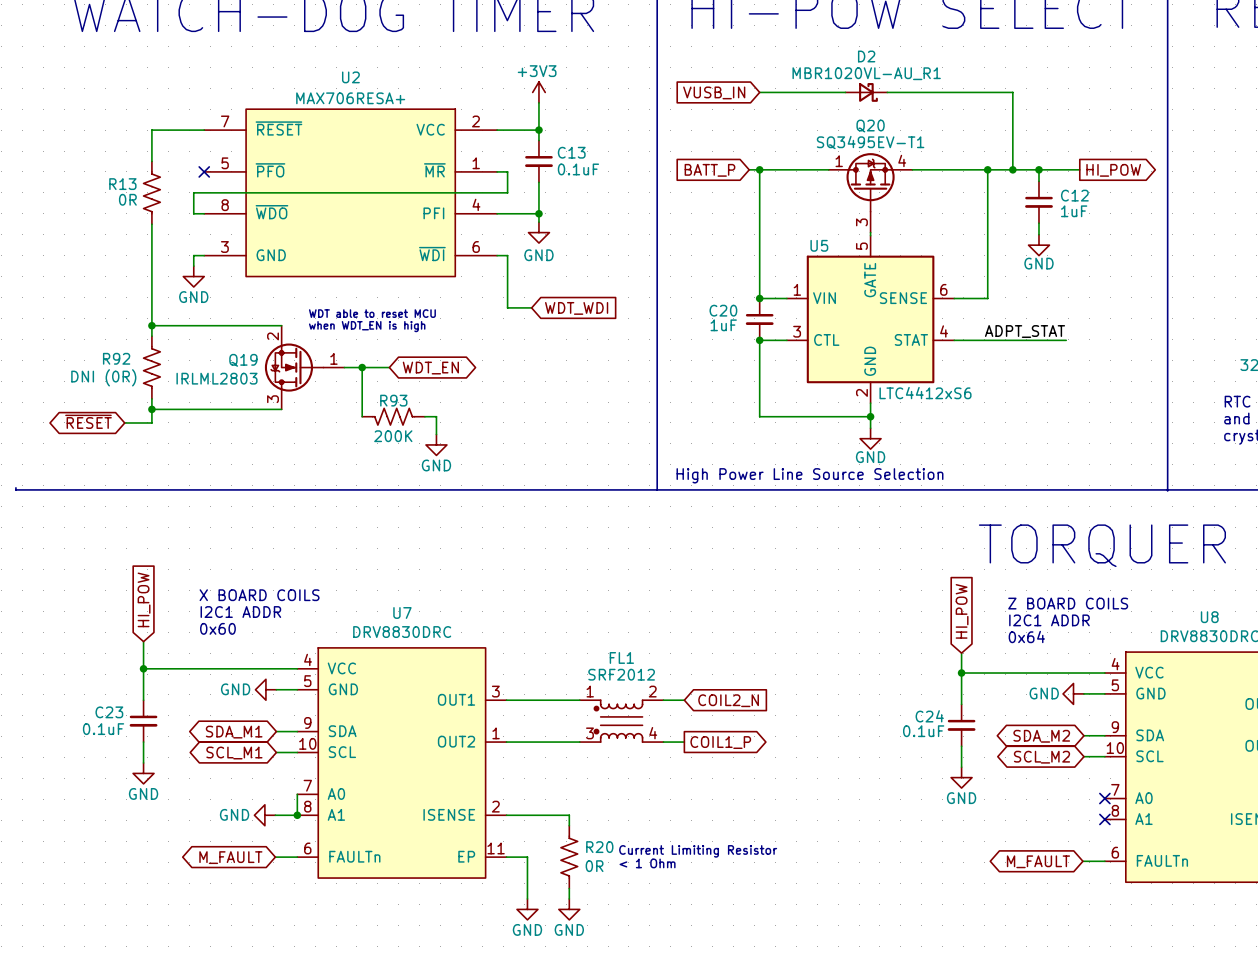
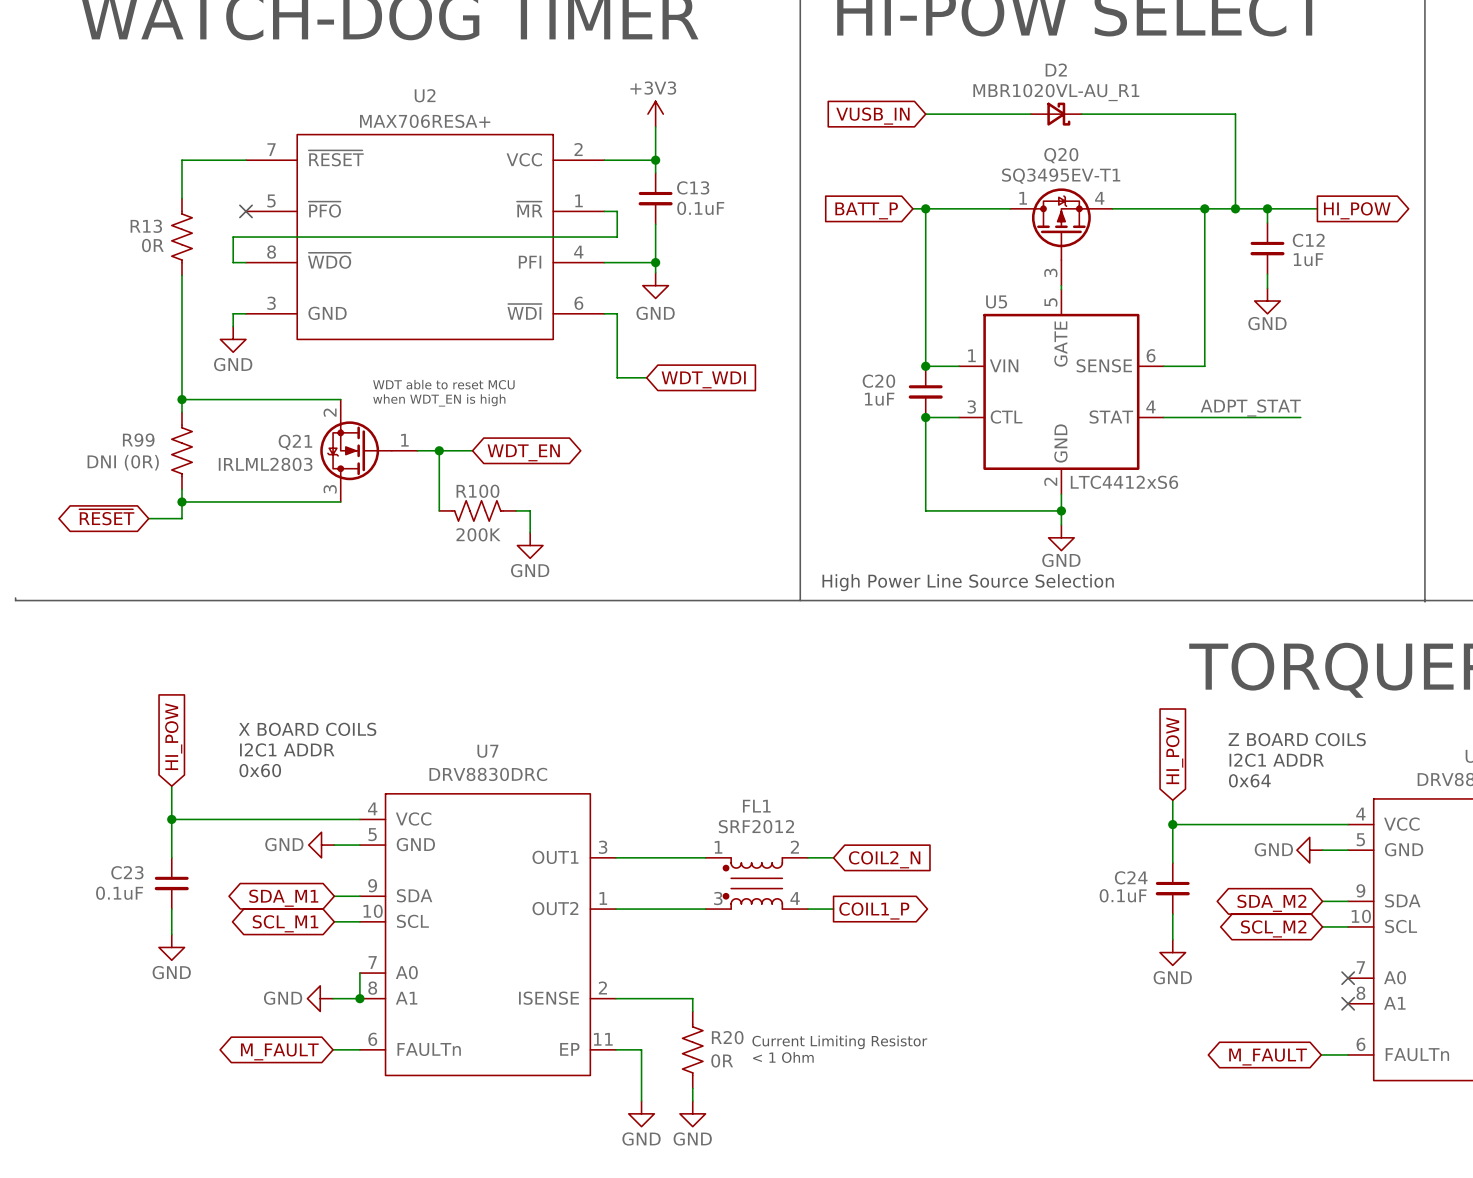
R92 name: R92 (116, 358) -> R99 (138, 440)
Q19 name: Q19 (243, 360) -> Q21 (295, 442)
R93 name: R93 (393, 400) -> R100 (477, 491)

